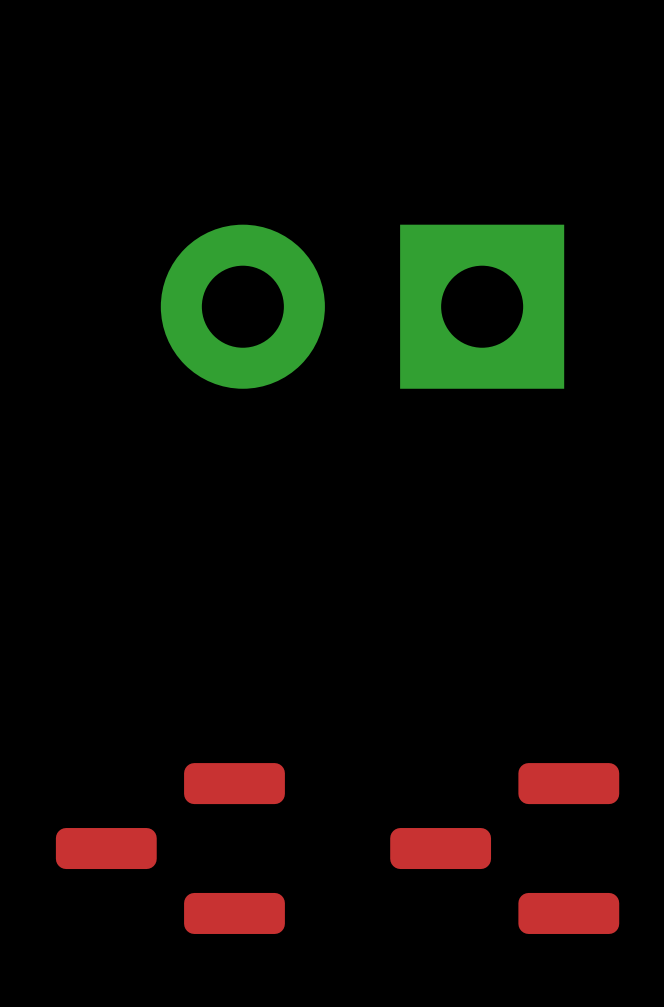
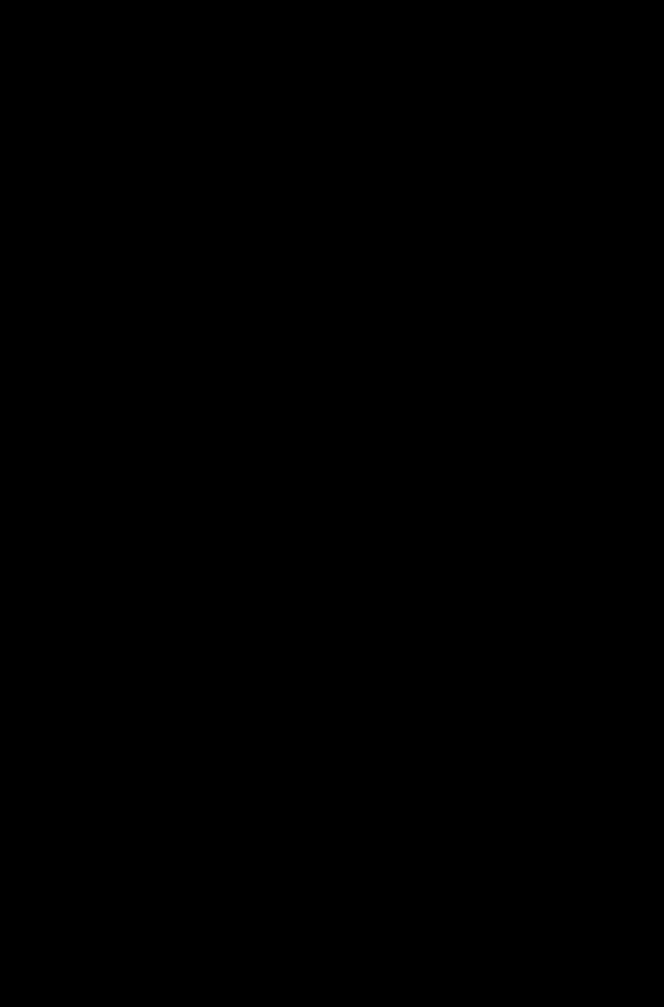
part: (362, 306) -> none
part: (170, 848) -> none
part: (504, 848) -> none

